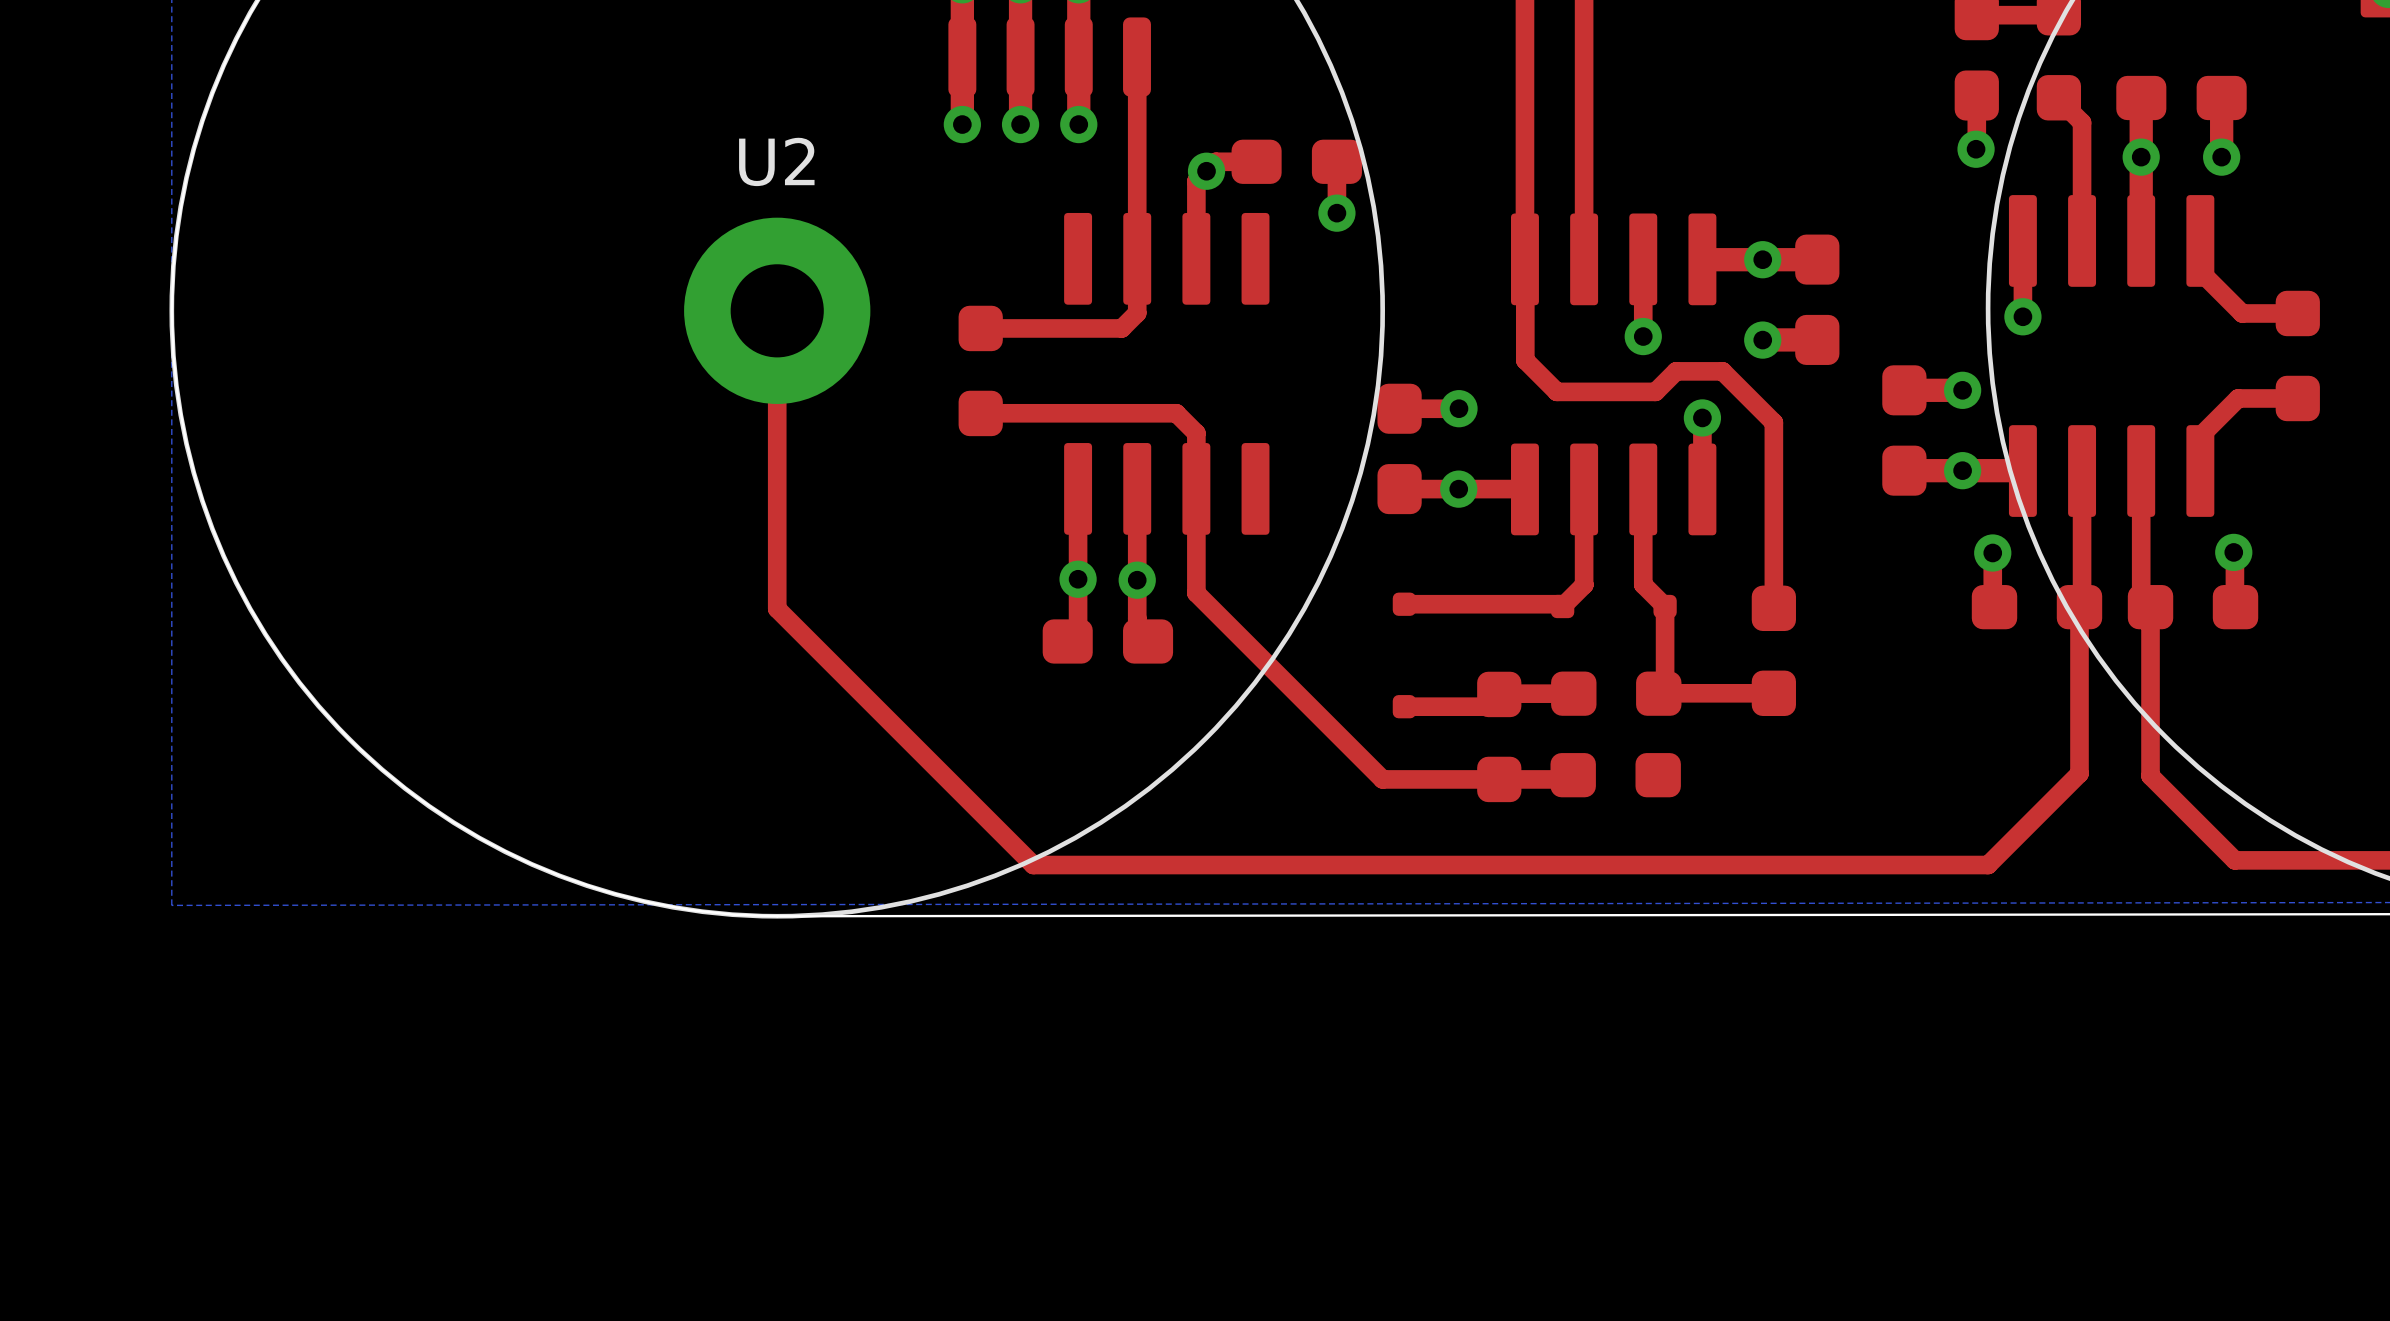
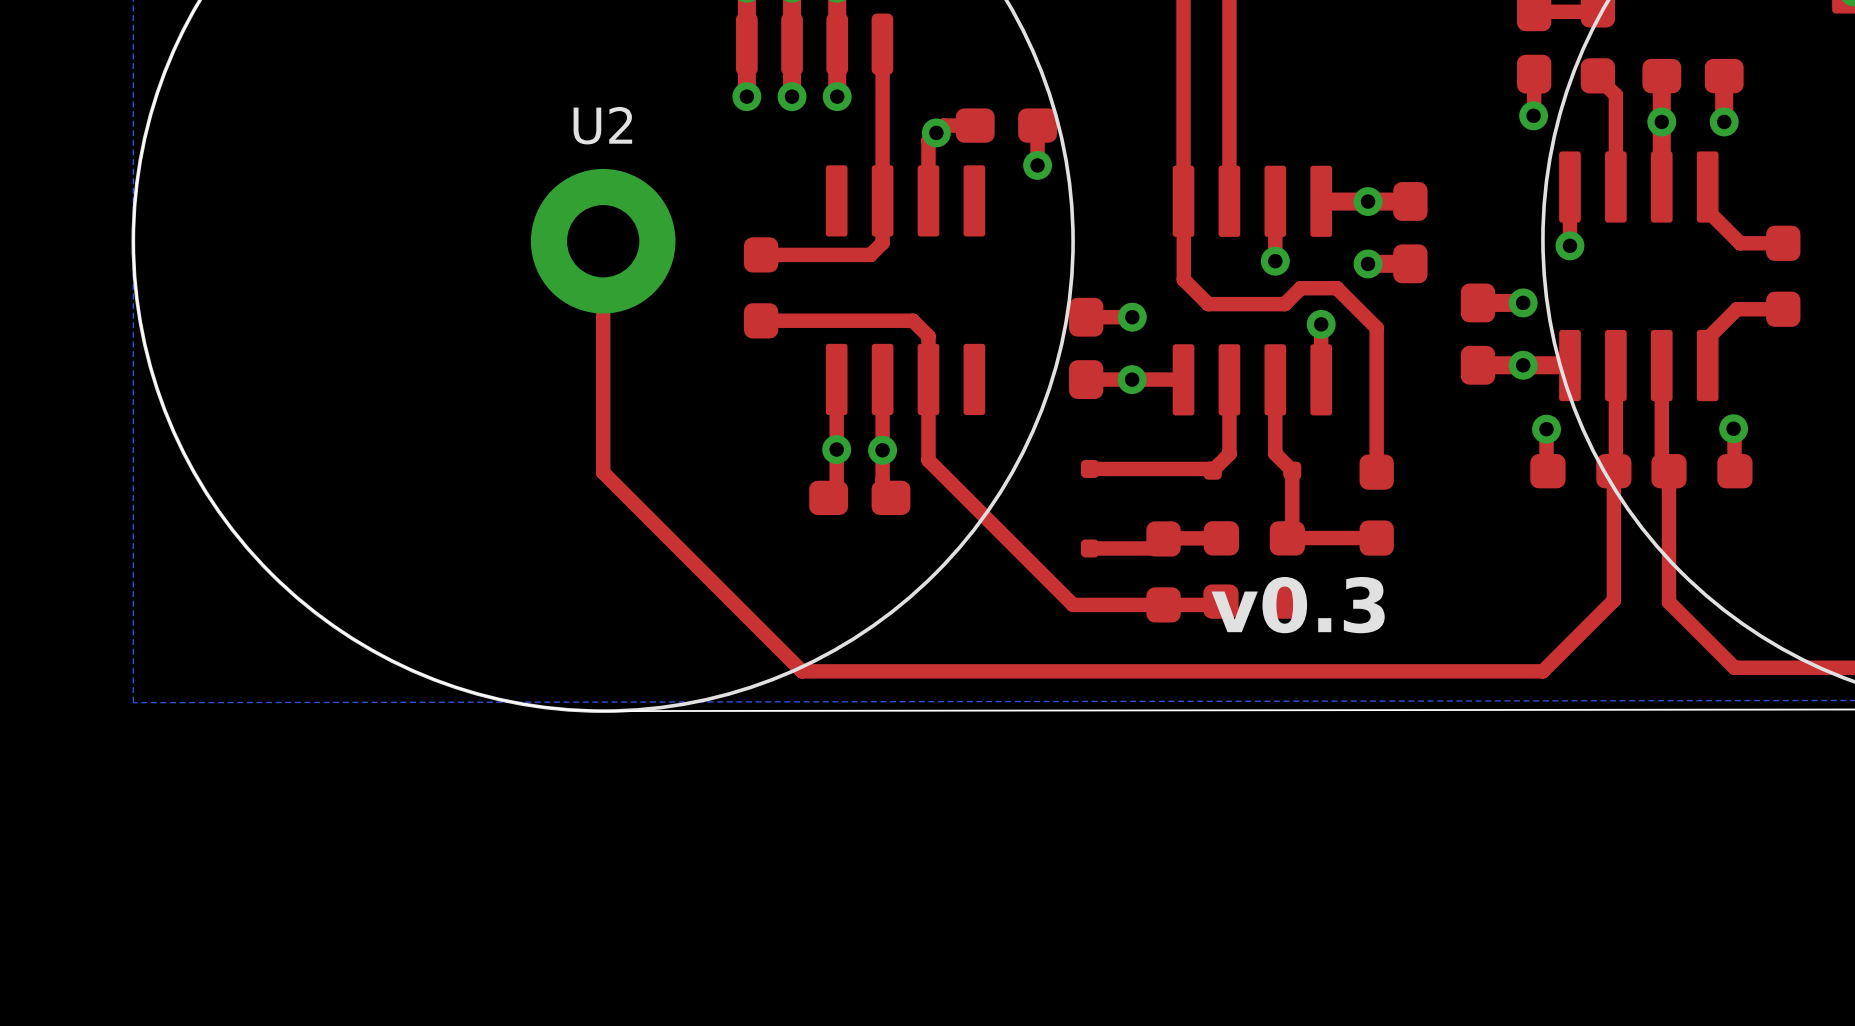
text: none -> v0.3 (1298, 605)

